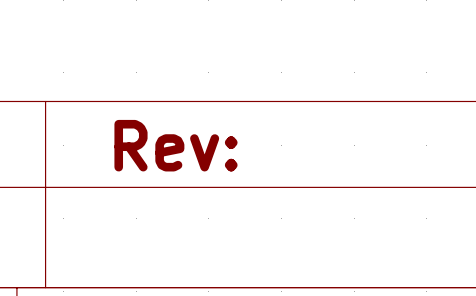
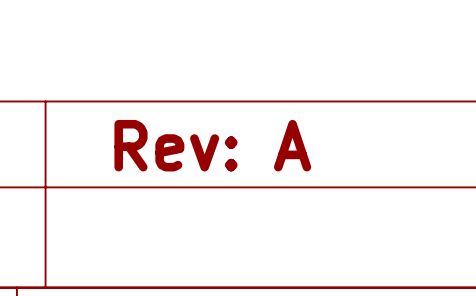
title block: Rev: (175, 145) -> Rev: A (212, 145)

